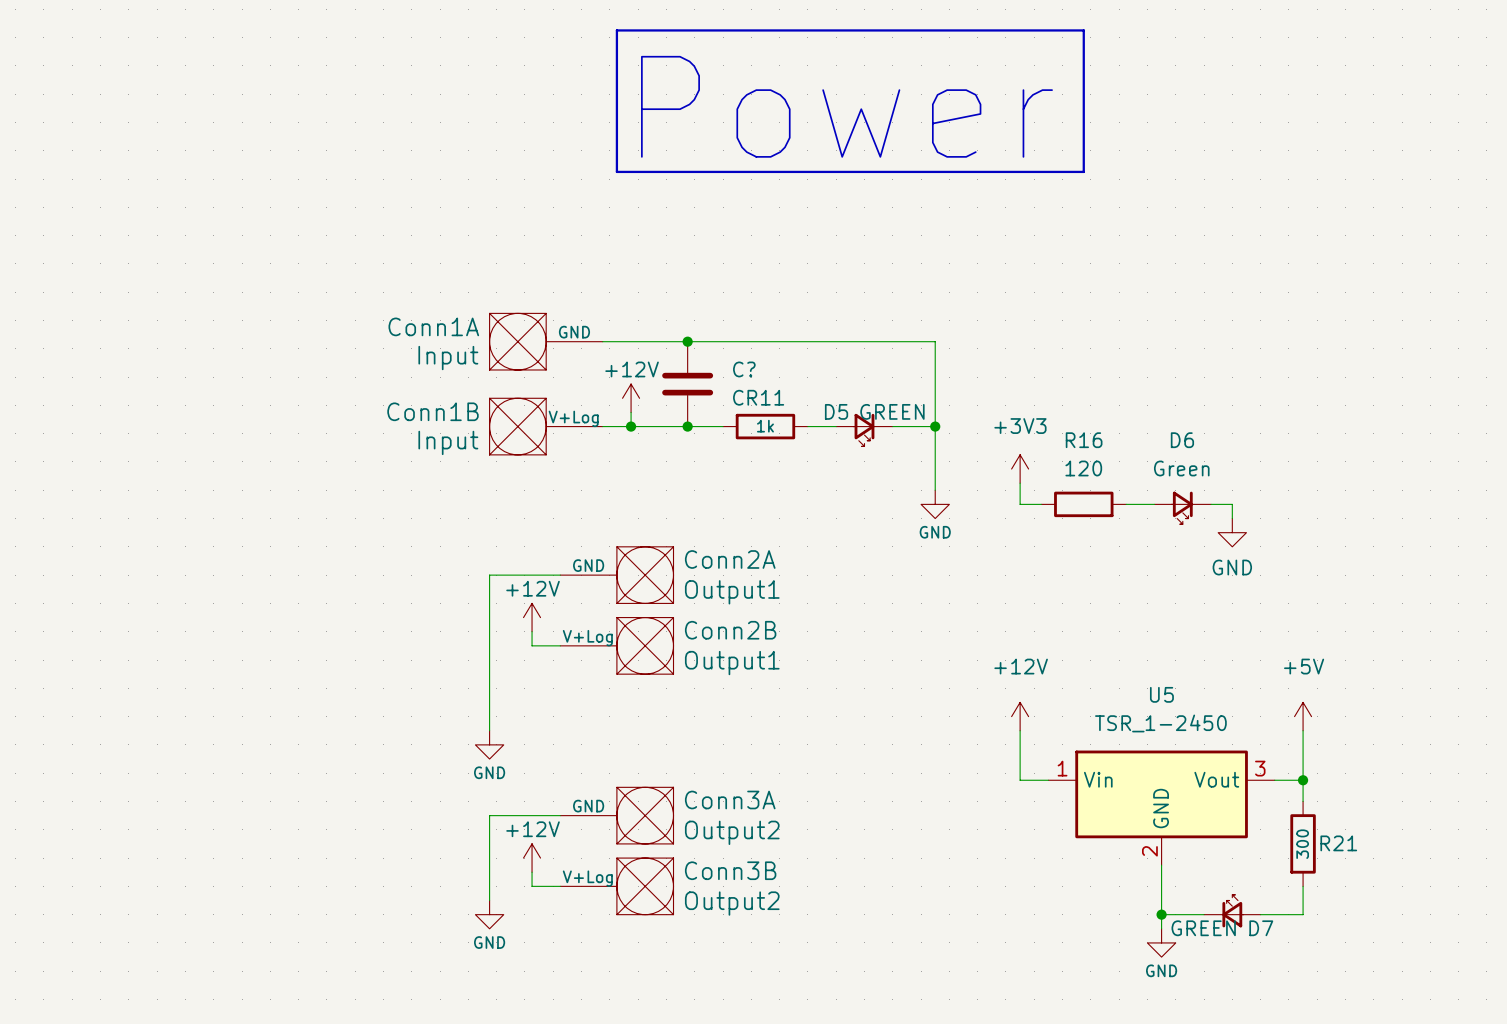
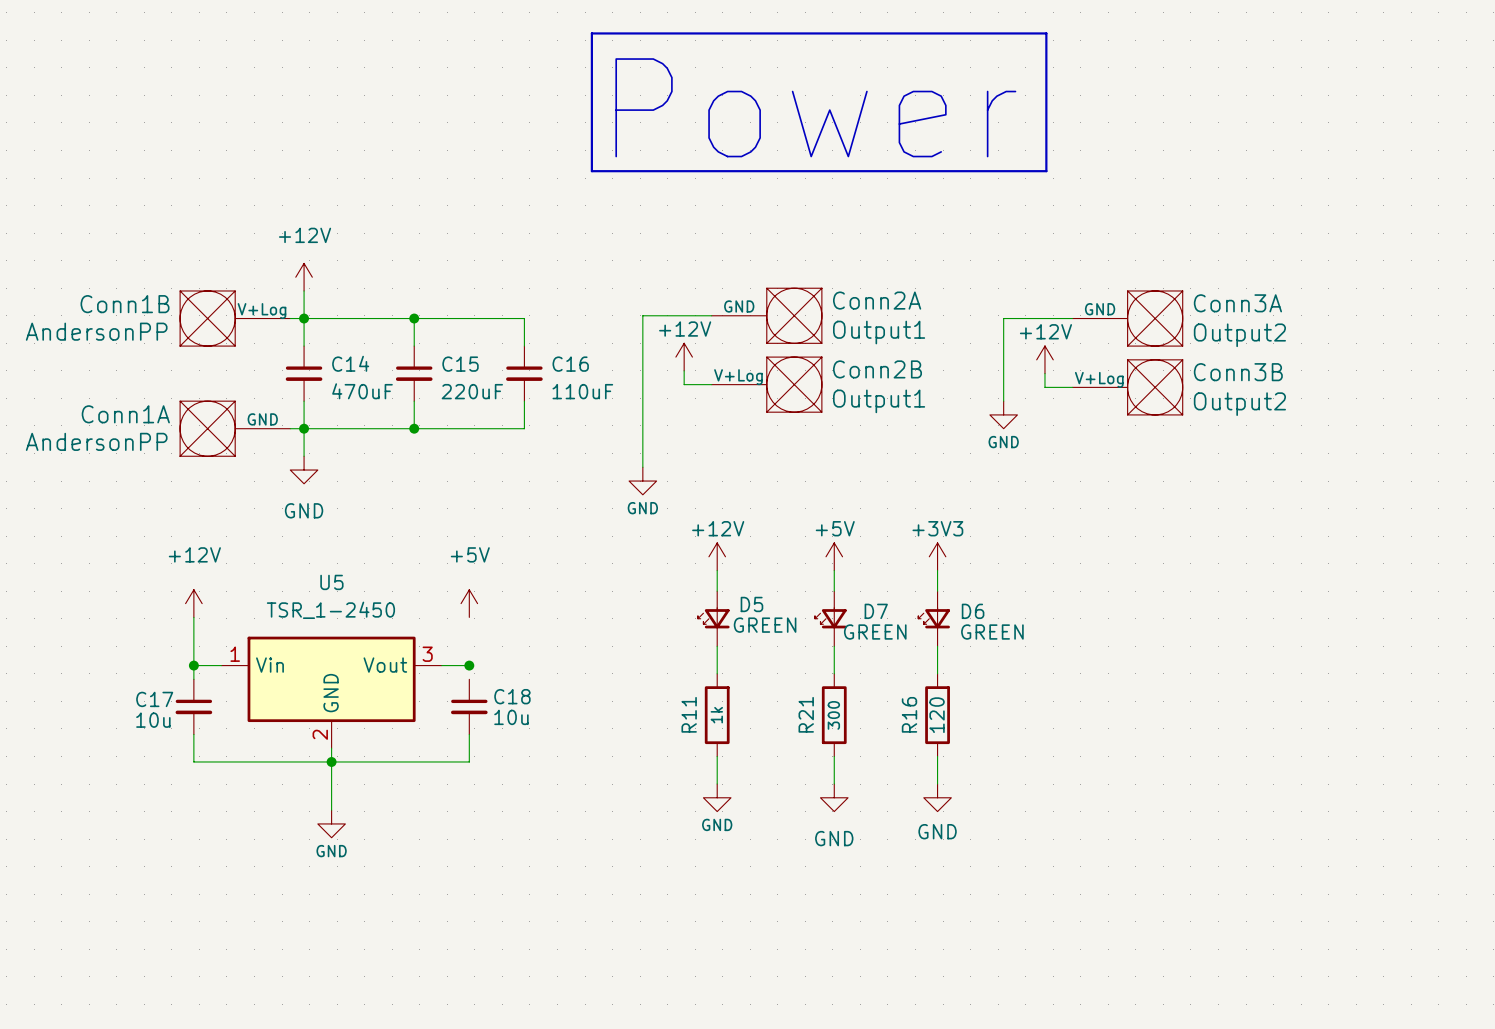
power symbol: none -> +12V (304, 277)
wire: none -> (304, 290) (304, 346)
wire: none -> (711, 315) (642, 315) (642, 467)
wire: none -> (290, 318) (524, 318) (524, 346)
junction: none -> (304, 318)
wire: none -> (414, 318) (414, 346)
junction: none -> (414, 318)
wire: none -> (1072, 318) (1003, 318) (1003, 401)
Conn1A position: (546, 341) -> (235, 428)
wire: (602, 341) (935, 341) (935, 490) -> none
junction: (687, 341) -> none
Conn1A value: Input (448, 358) -> AndersonPP (96, 441)
power symbol: none -> +12V (1044, 359)
wire: none -> (684, 370) (684, 384) (711, 384)
C14: none -> 470uF (304, 373)
C15: none -> 220uF (414, 373)
C16: none -> 110uF (524, 373)
wire: none -> (1044, 373) (1044, 387) (1072, 387)
C?: C (687, 384) -> none
R11 name position: R11 (765, 397) -> R11 (689, 714)
power symbol position: +12V (631, 398) -> +12V (684, 357)
wire: none -> (304, 401) (304, 456)
wire: none -> (414, 401) (414, 428)
wire: none -> (524, 401) (524, 428) (290, 428)
D5 name position: D5 (836, 411) -> D5 (751, 604)
D5 value position: GREEN (892, 411) -> GREEN (765, 625)
wire: (631, 412) (631, 426) -> none
power symbol: none -> GND (1003, 414)
Conn1B position: (546, 426) -> (235, 318)
wire: (602, 426) (723, 426) -> none
junction: (631, 426) -> none
junction: (687, 426) -> none
R11 rotation: 0° (765, 426) -> 90° clockwise (717, 715)
R11 position: (765, 426) -> (717, 715)
wire: (807, 426) (836, 426) -> none
wire: (892, 426) (935, 426) -> none
junction: (935, 426) -> none
power symbol text position: +3V3 (1020, 426) -> +3V3 (937, 528)
D5 rotation: 0° (863, 430) -> 90° clockwise (713, 618)
D5 position: (864, 430) -> (713, 618)
junction: none -> (304, 428)
junction: none -> (414, 428)
R16 name position: R16 (1084, 440) -> R16 (909, 714)
D6 name position: D6 (1182, 440) -> D6 (973, 611)
Conn1B value: Input (448, 442) -> AndersonPP (96, 331)
R16 value position: 120 (1083, 468) -> 120 (937, 715)
D6 value: Green (1181, 468) -> GREEN (992, 632)
power symbol position: +3V3 (1020, 469) -> +3V3 (937, 556)
power symbol: none -> GND (304, 470)
wire: (1020, 483) (1020, 504) (1041, 504) -> none
power symbol: none -> GND (642, 481)
power symbol: GND (935, 504) -> none
R16 rotation: 0° (1083, 504) -> 90° clockwise (937, 715)
R16 position: (1083, 504) -> (937, 715)
wire: (1126, 504) (1154, 504) -> none
wire: (1211, 504) (1232, 504) (1232, 518) -> none
D6 rotation: 0° (1182, 507) -> 90° clockwise (934, 618)
D6 position: (1182, 507) -> (934, 618)
power symbol: GND (1232, 532) -> none
power symbol: none -> +12V (717, 556)
power symbol: none -> +5V (834, 556)
wire: (560, 575) (489, 575) (489, 730) -> none
Conn2A position: (616, 575) -> (766, 315)
wire: none -> (834, 570) (834, 591)
wire: none -> (937, 570) (937, 591)
power symbol: none -> +12V (193, 603)
power symbol: none -> +5V (469, 603)
power symbol: +12V (532, 617) -> none
wire: none -> (193, 617) (193, 679)
wire: (532, 631) (532, 645) (560, 645) -> none
Conn2B position: (616, 645) -> (766, 384)
wire: none -> (717, 646) (717, 673)
wire: none -> (834, 646) (834, 673)
wire: none -> (937, 646) (937, 673)
wire: none -> (193, 665) (221, 665)
junction: none -> (193, 665)
wire: none -> (441, 665) (469, 665)
junction: none -> (469, 665)
power symbol: +12V (1020, 716) -> none
power symbol: +5V (1303, 716) -> none
C17: none -> 10u (193, 706)
C18: none -> 10u (469, 706)
wire: (1020, 730) (1020, 780) (1048, 780) -> none
wire: (1303, 730) (1303, 801) -> none
power symbol: GND (489, 744) -> none
wire: none -> (193, 734) (193, 761) (469, 761) (469, 734)
wire: none -> (331, 748) (331, 810)
wire: none -> (717, 756) (717, 784)
wire: none -> (834, 756) (834, 784)
wire: none -> (937, 756) (937, 784)
junction: none -> (331, 761)
wire: (1274, 780) (1303, 780) -> none
junction: (1303, 780) -> none
U5 position: (1161, 807) -> (331, 692)
wire: (560, 815) (489, 815) (489, 900) -> none
Conn3A position: (616, 815) -> (1127, 318)
power symbol: none -> GND (717, 797)
power symbol: none -> GND (834, 797)
power symbol: none -> GND (937, 797)
power symbol: none -> GND (331, 823)
R21 position: (1303, 843) -> (834, 715)
R21 name rotation: 0° (1338, 843) -> 90° counterclockwise (806, 714)
R21 name position: R21 (1338, 843) -> R21 (806, 714)
power symbol: +12V (532, 858) -> none
wire: (1161, 865) (1161, 928) -> none
wire: (532, 872) (532, 886) (560, 886) -> none
Conn3B position: (616, 886) -> (1127, 387)
wire: (1303, 886) (1303, 914) (1260, 914) -> none
D7 position: (1232, 911) -> (830, 618)
D7 rotation: 0° (1233, 911) -> 90° counterclockwise (830, 618)
power symbol: GND (489, 914) -> none
wire: (1161, 914) (1204, 914) -> none
junction: (1161, 914) -> none
D7 value position: GREEN (1203, 928) -> GREEN (875, 632)
D7 name position: D7 (1261, 928) -> D7 (876, 611)
power symbol: GND (1161, 942) -> none

